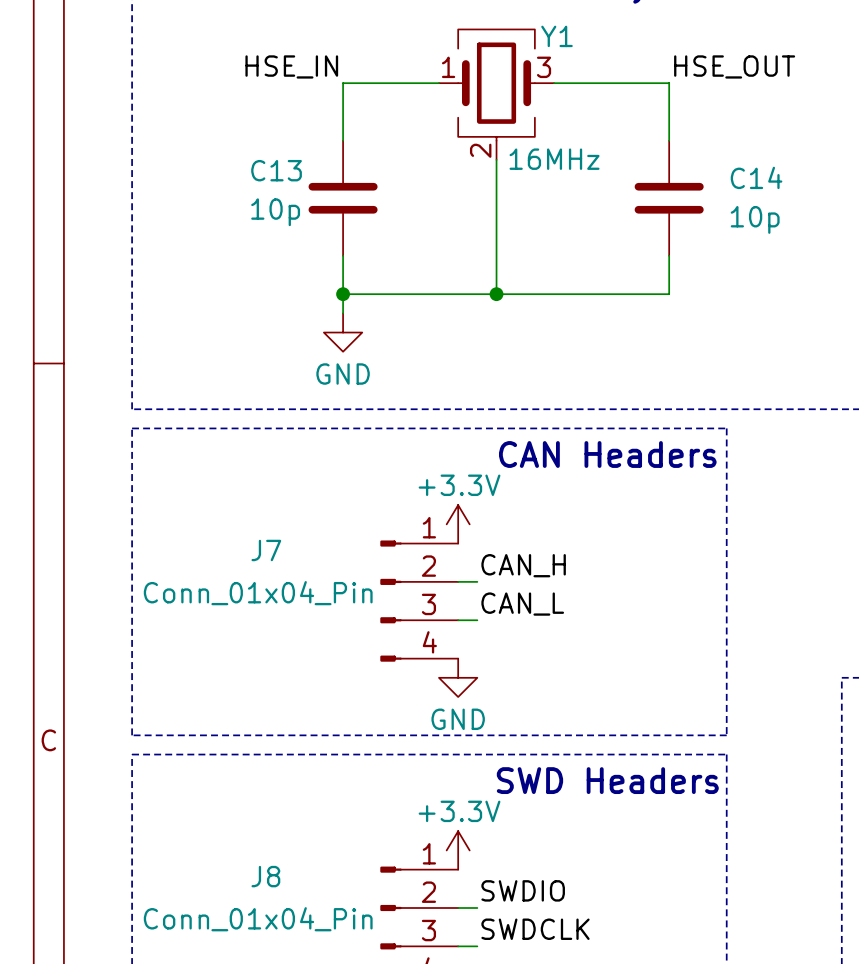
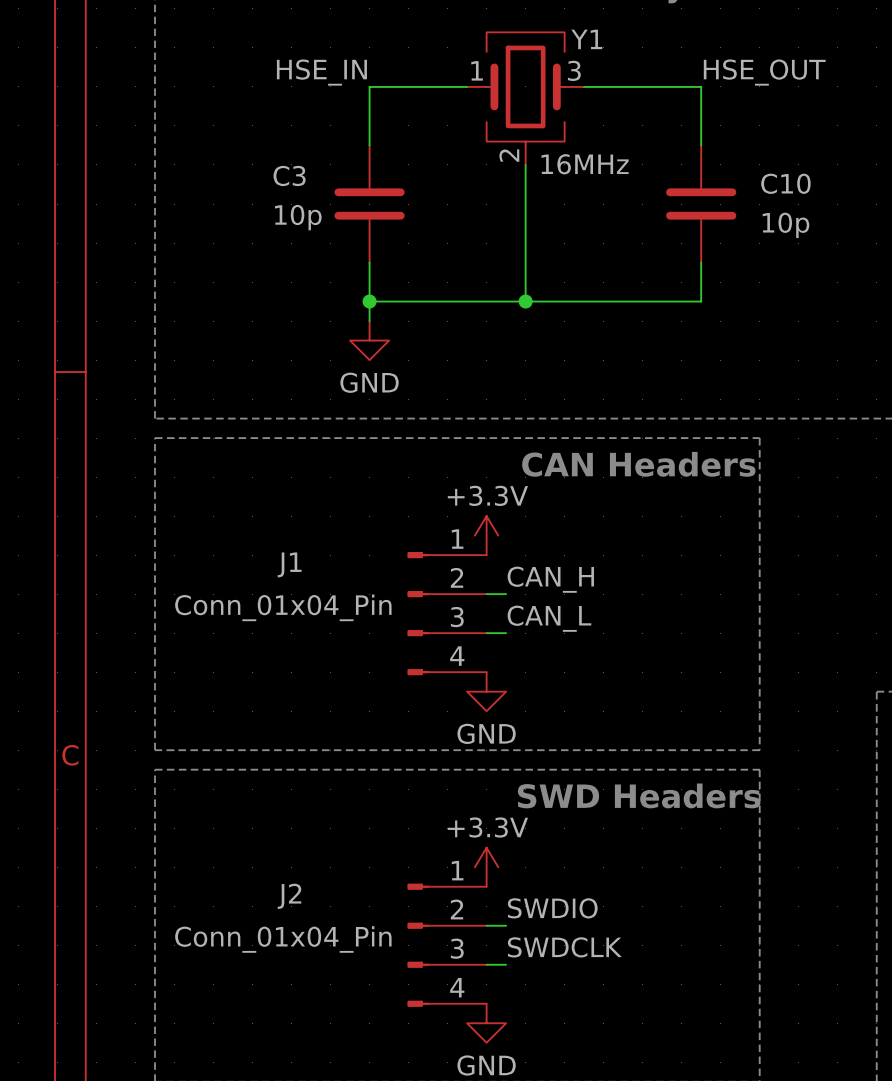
C13 name: C13 (276, 170) -> C3 (289, 175)
C14 name: C14 (756, 177) -> C10 (785, 183)
J7 name: J7 (266, 550) -> J1 (289, 564)
J8 name: J8 (265, 876) -> J2 (289, 896)

